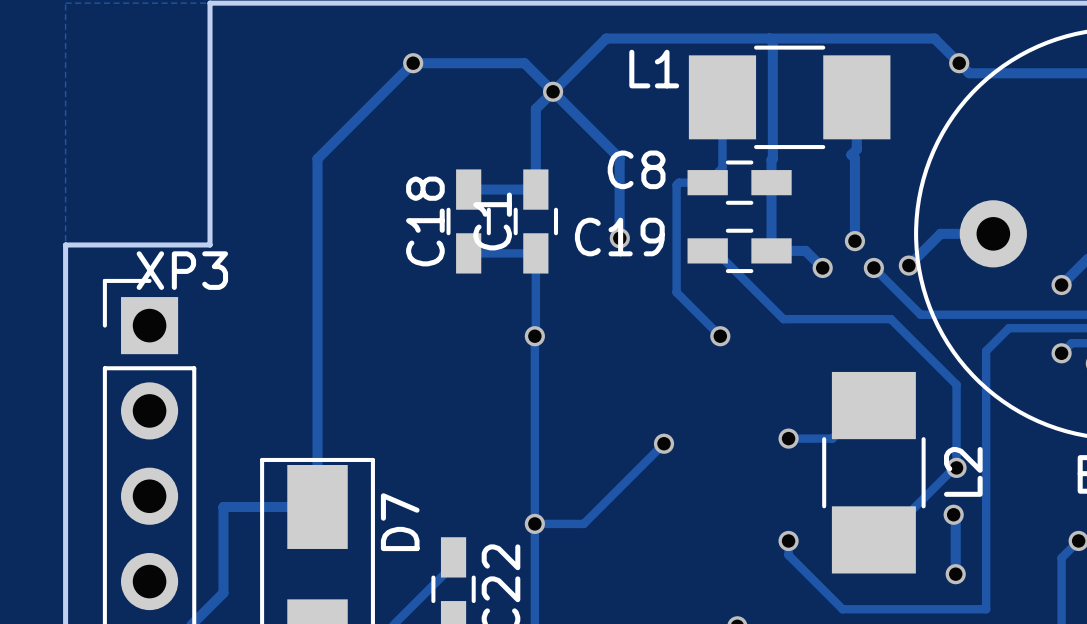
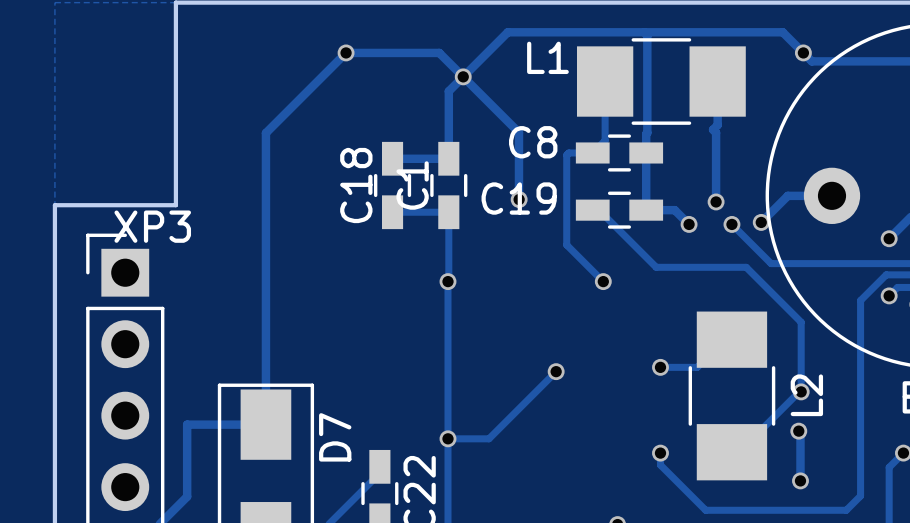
track: (1058, 328) (1008, 328) (986, 351) (986, 609) -> (886, 274) (860, 300) (860, 495) (846, 510) (825, 510)

